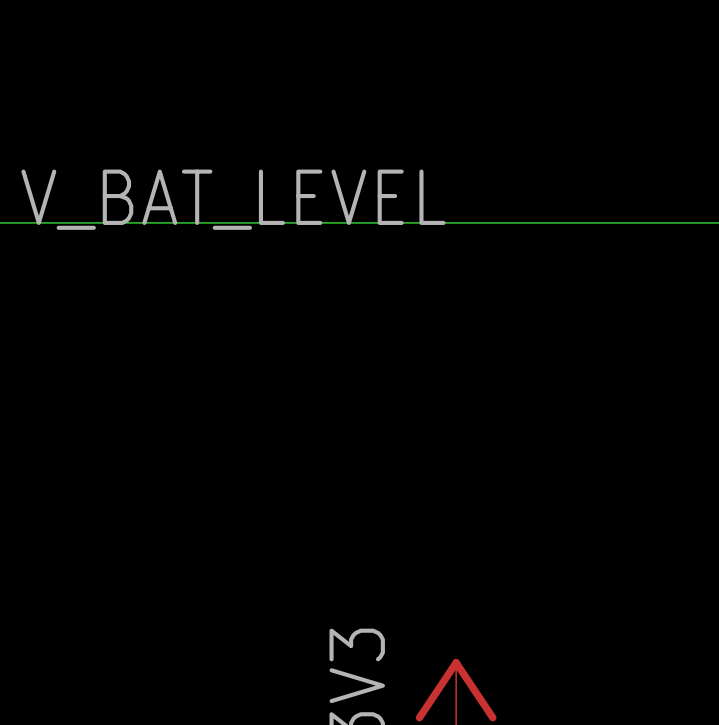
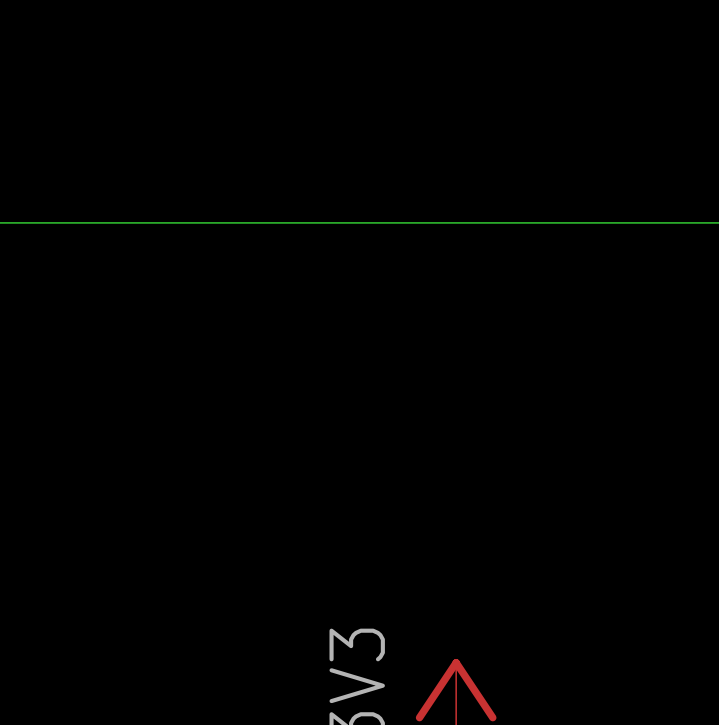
label: V_BAT_LEVEL (233, 199) -> none

